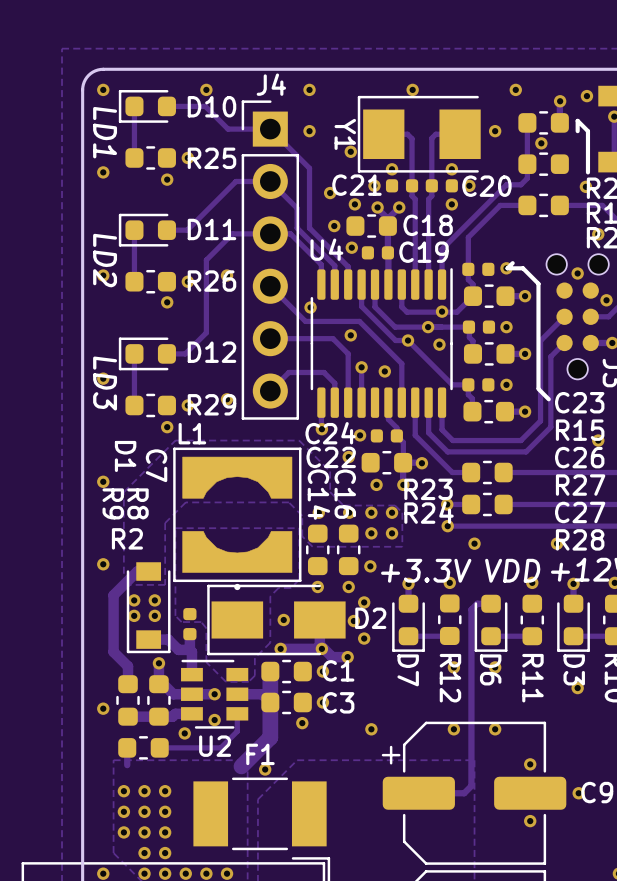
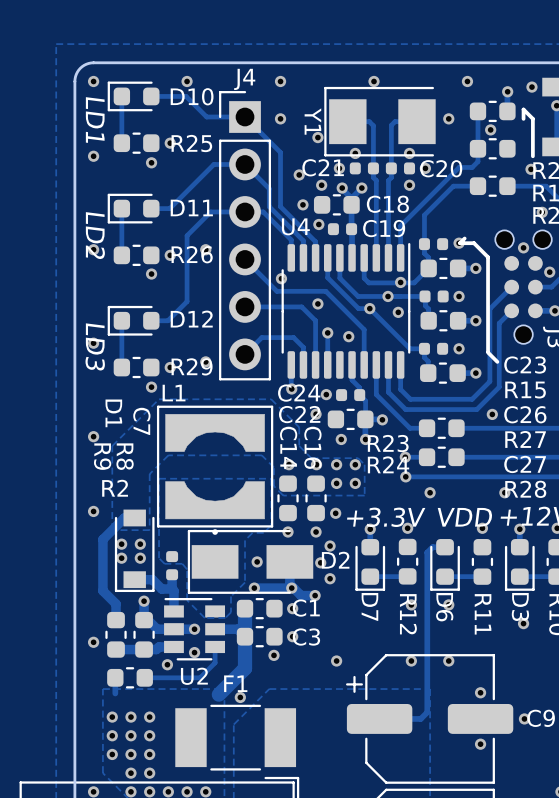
via: (598, 440) -> none
via: none -> (492, 414)

